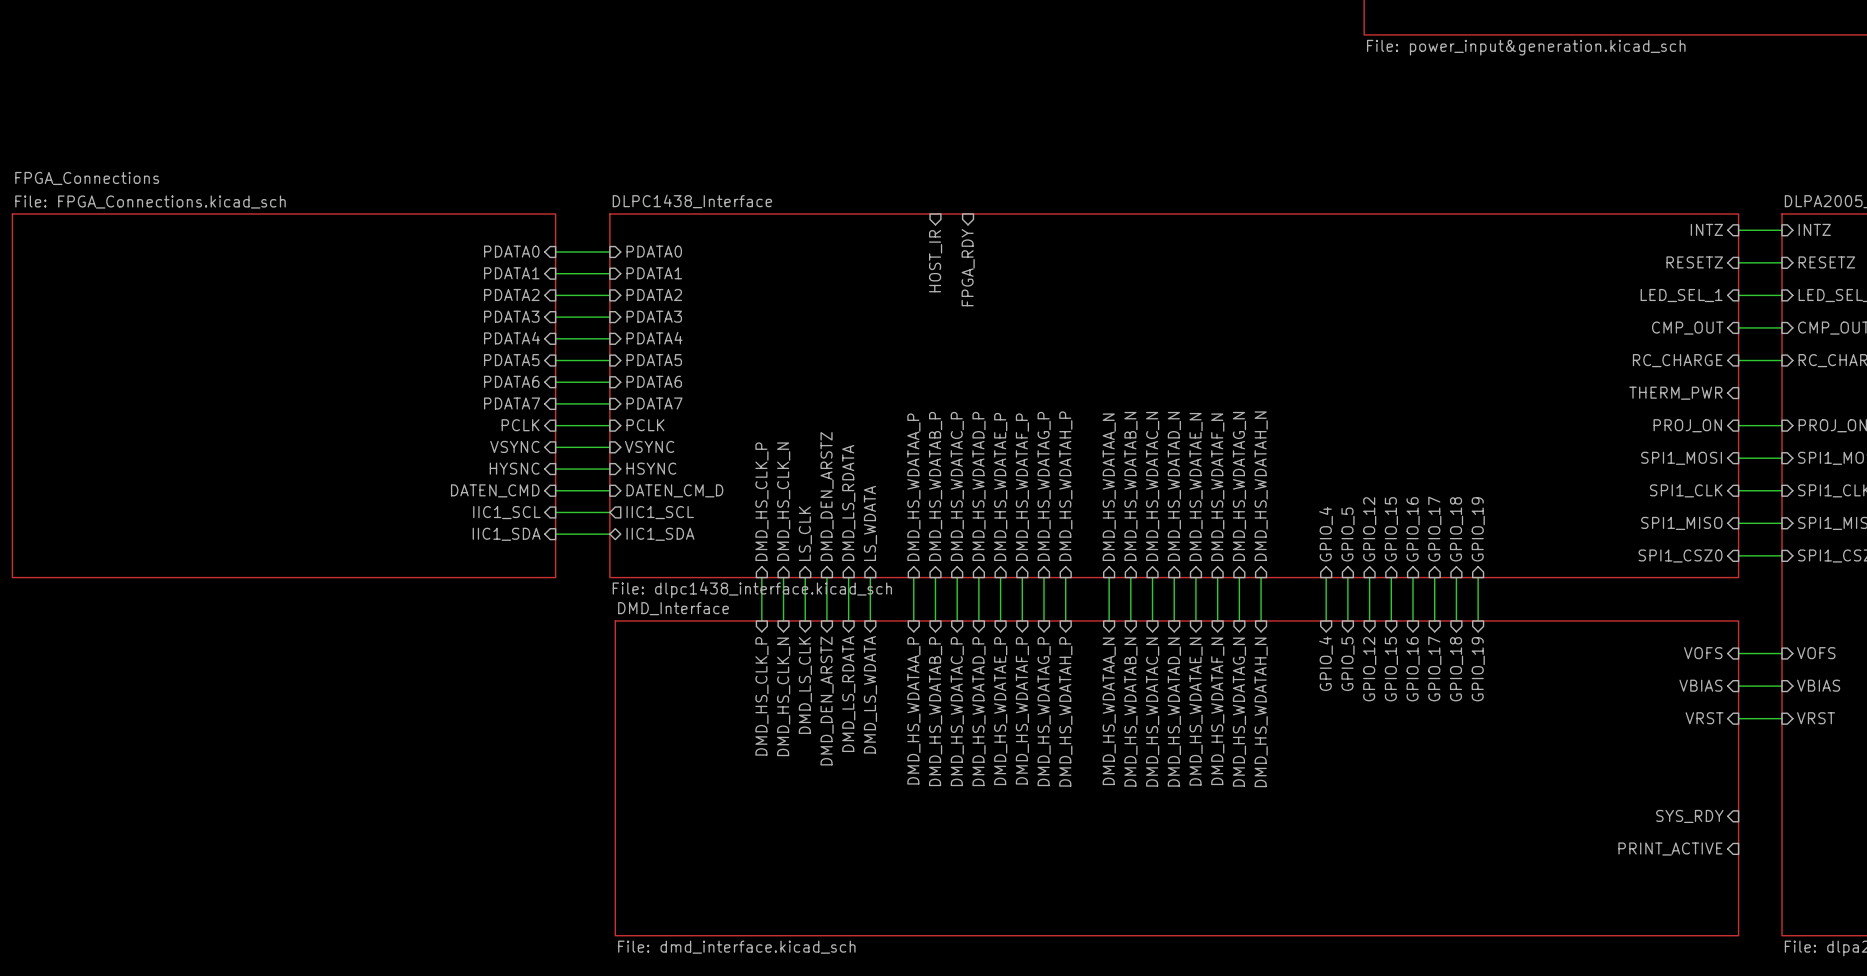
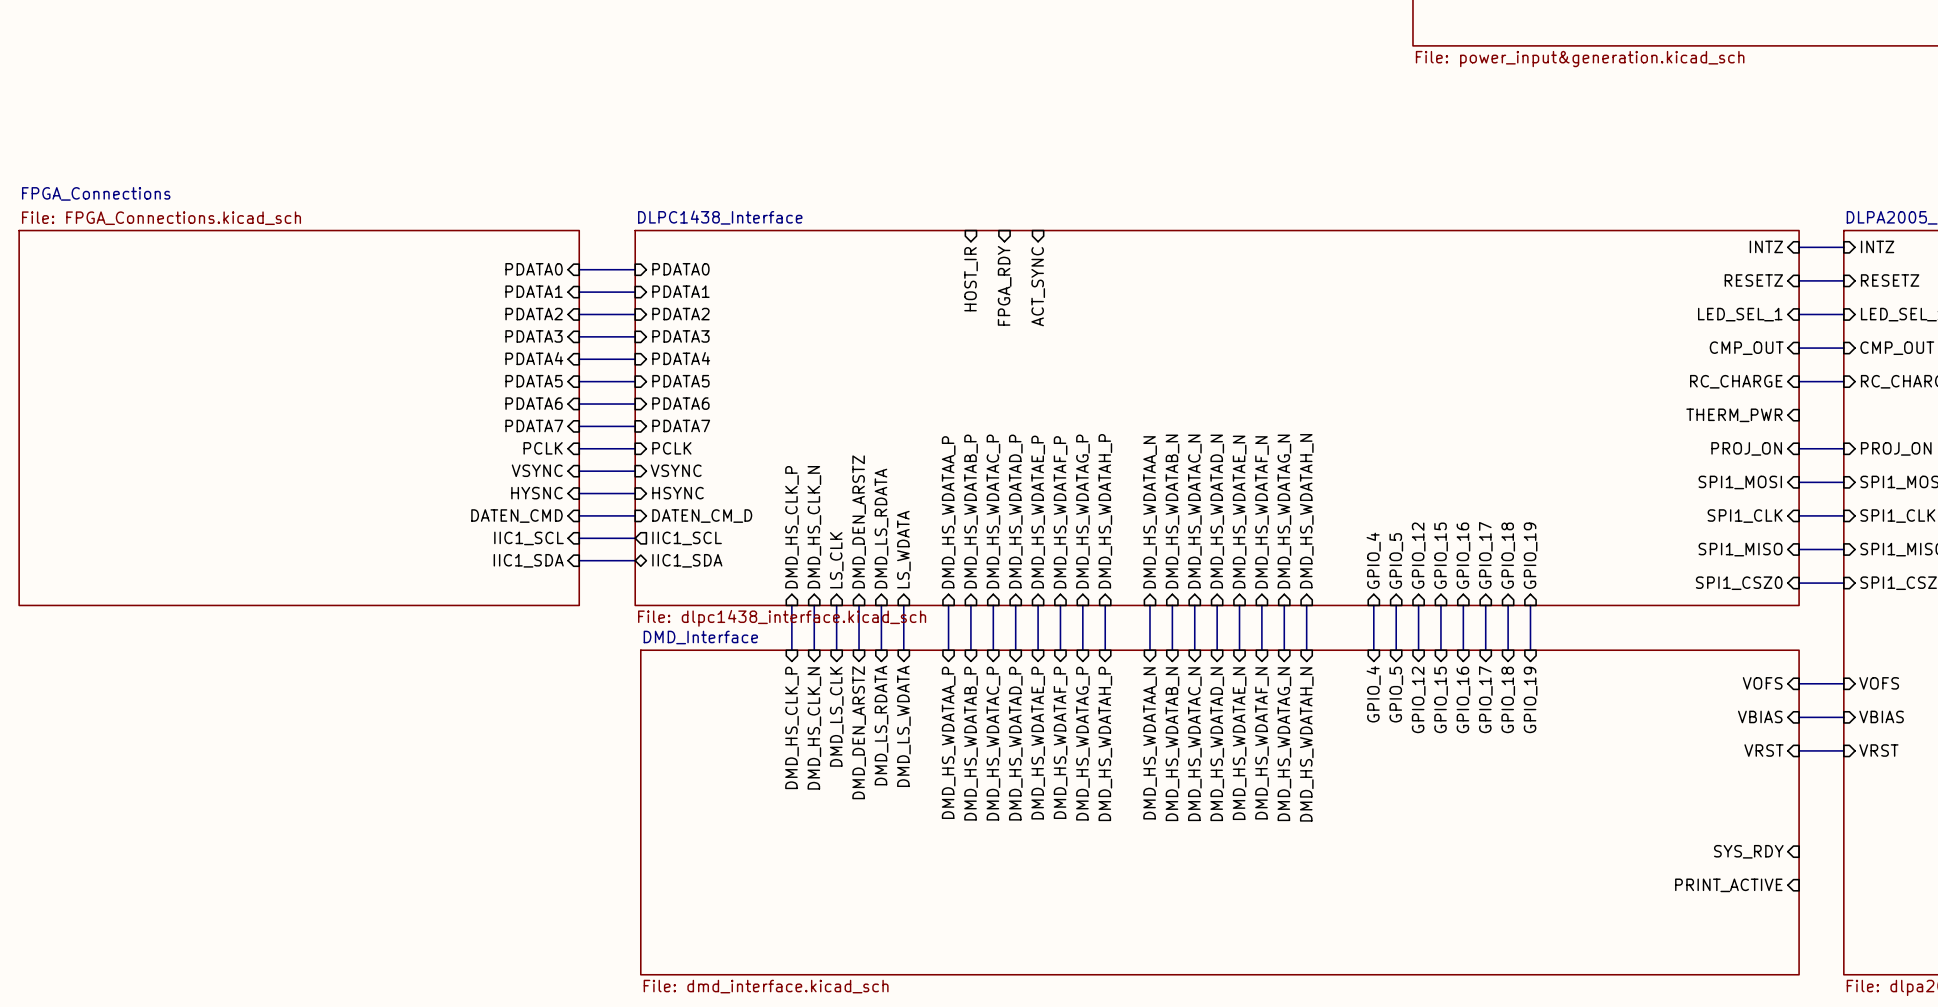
sheet pin: none -> ACT_SYNC (1038, 286)

